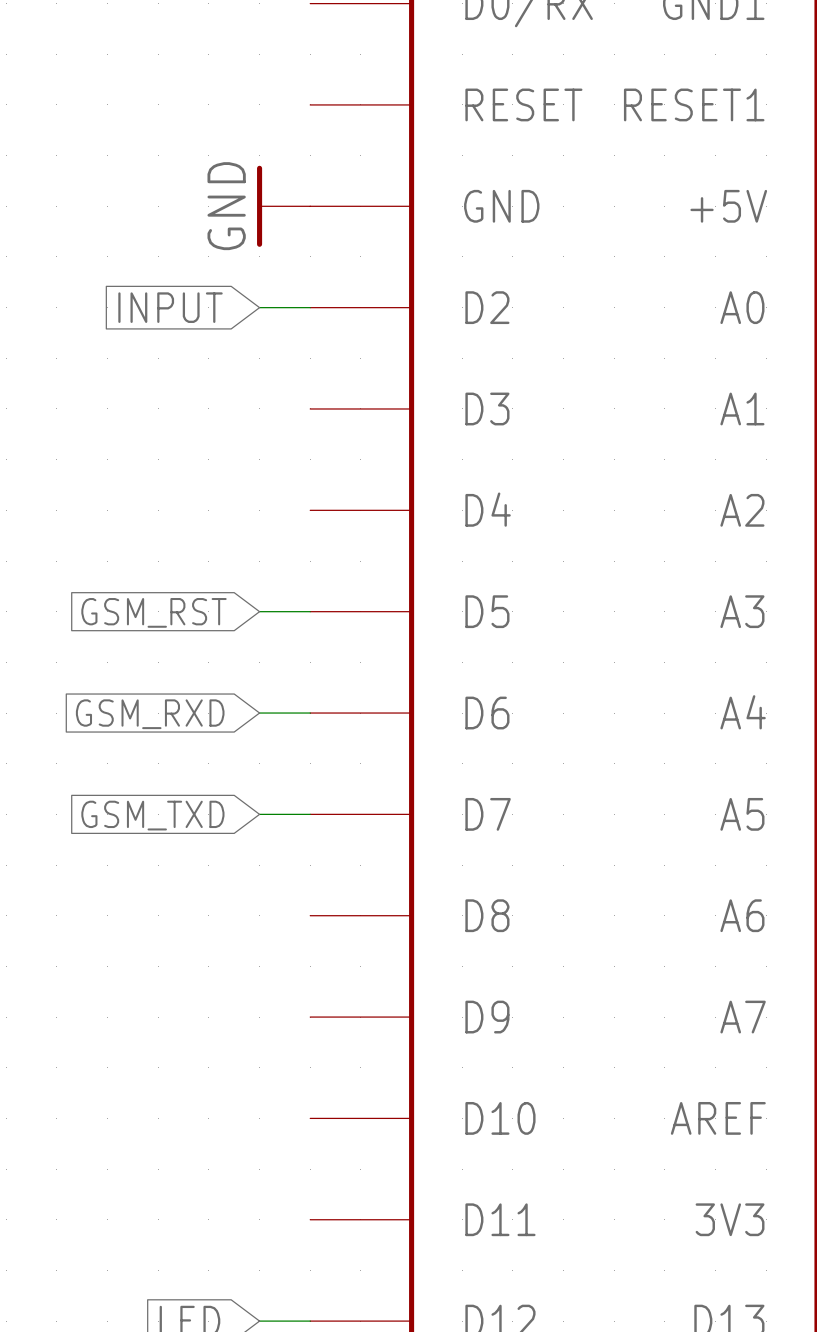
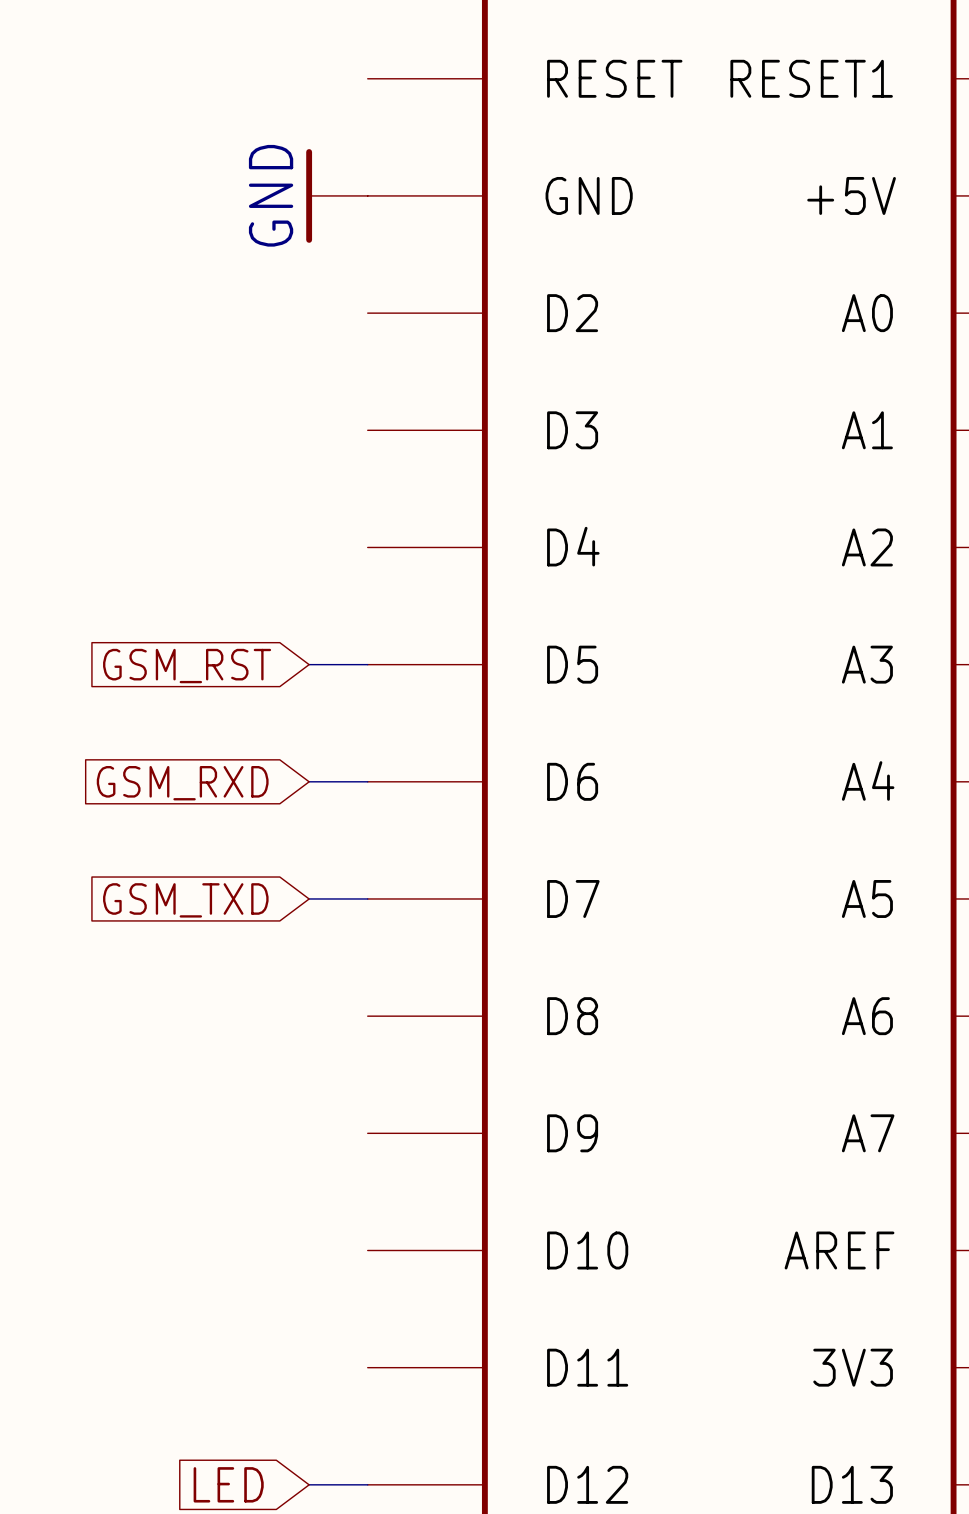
global label: INPUT (170, 307) -> none
wire: (259, 307) (310, 307) -> none

